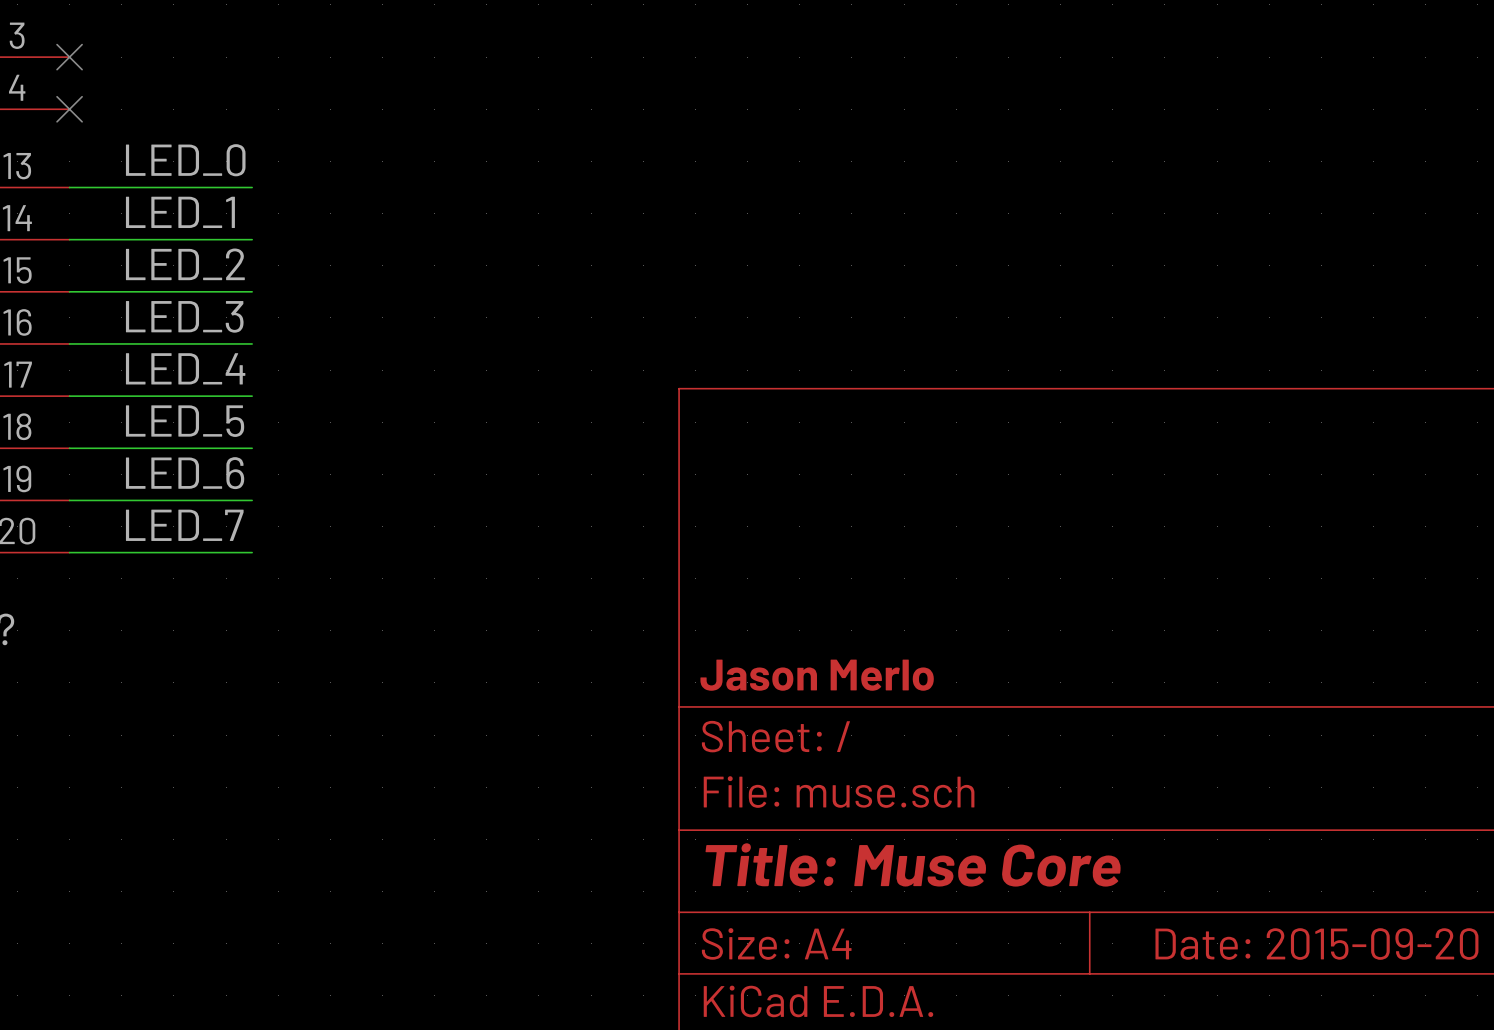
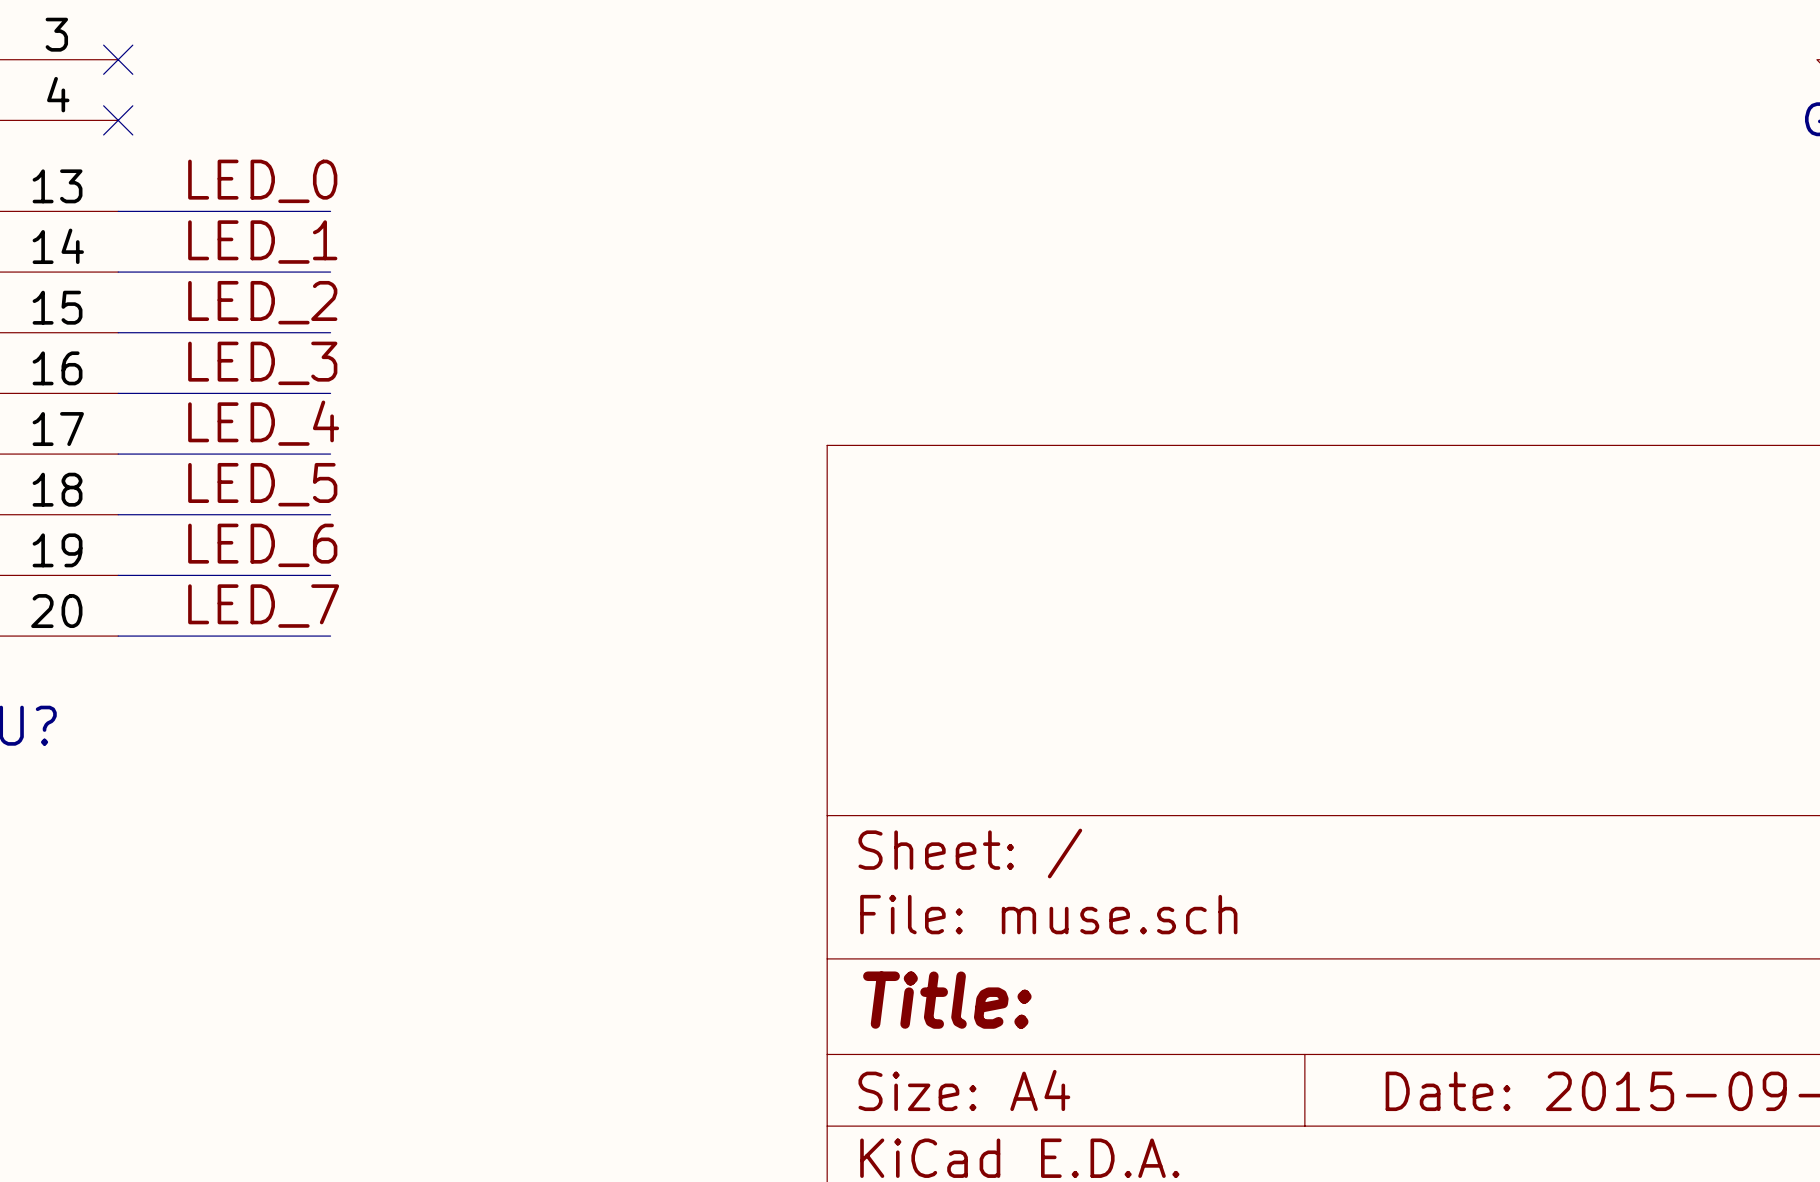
title block: Jason Merlo (817, 675) -> none
title block: Title: Muse Core (913, 864) -> Title: (947, 1000)

